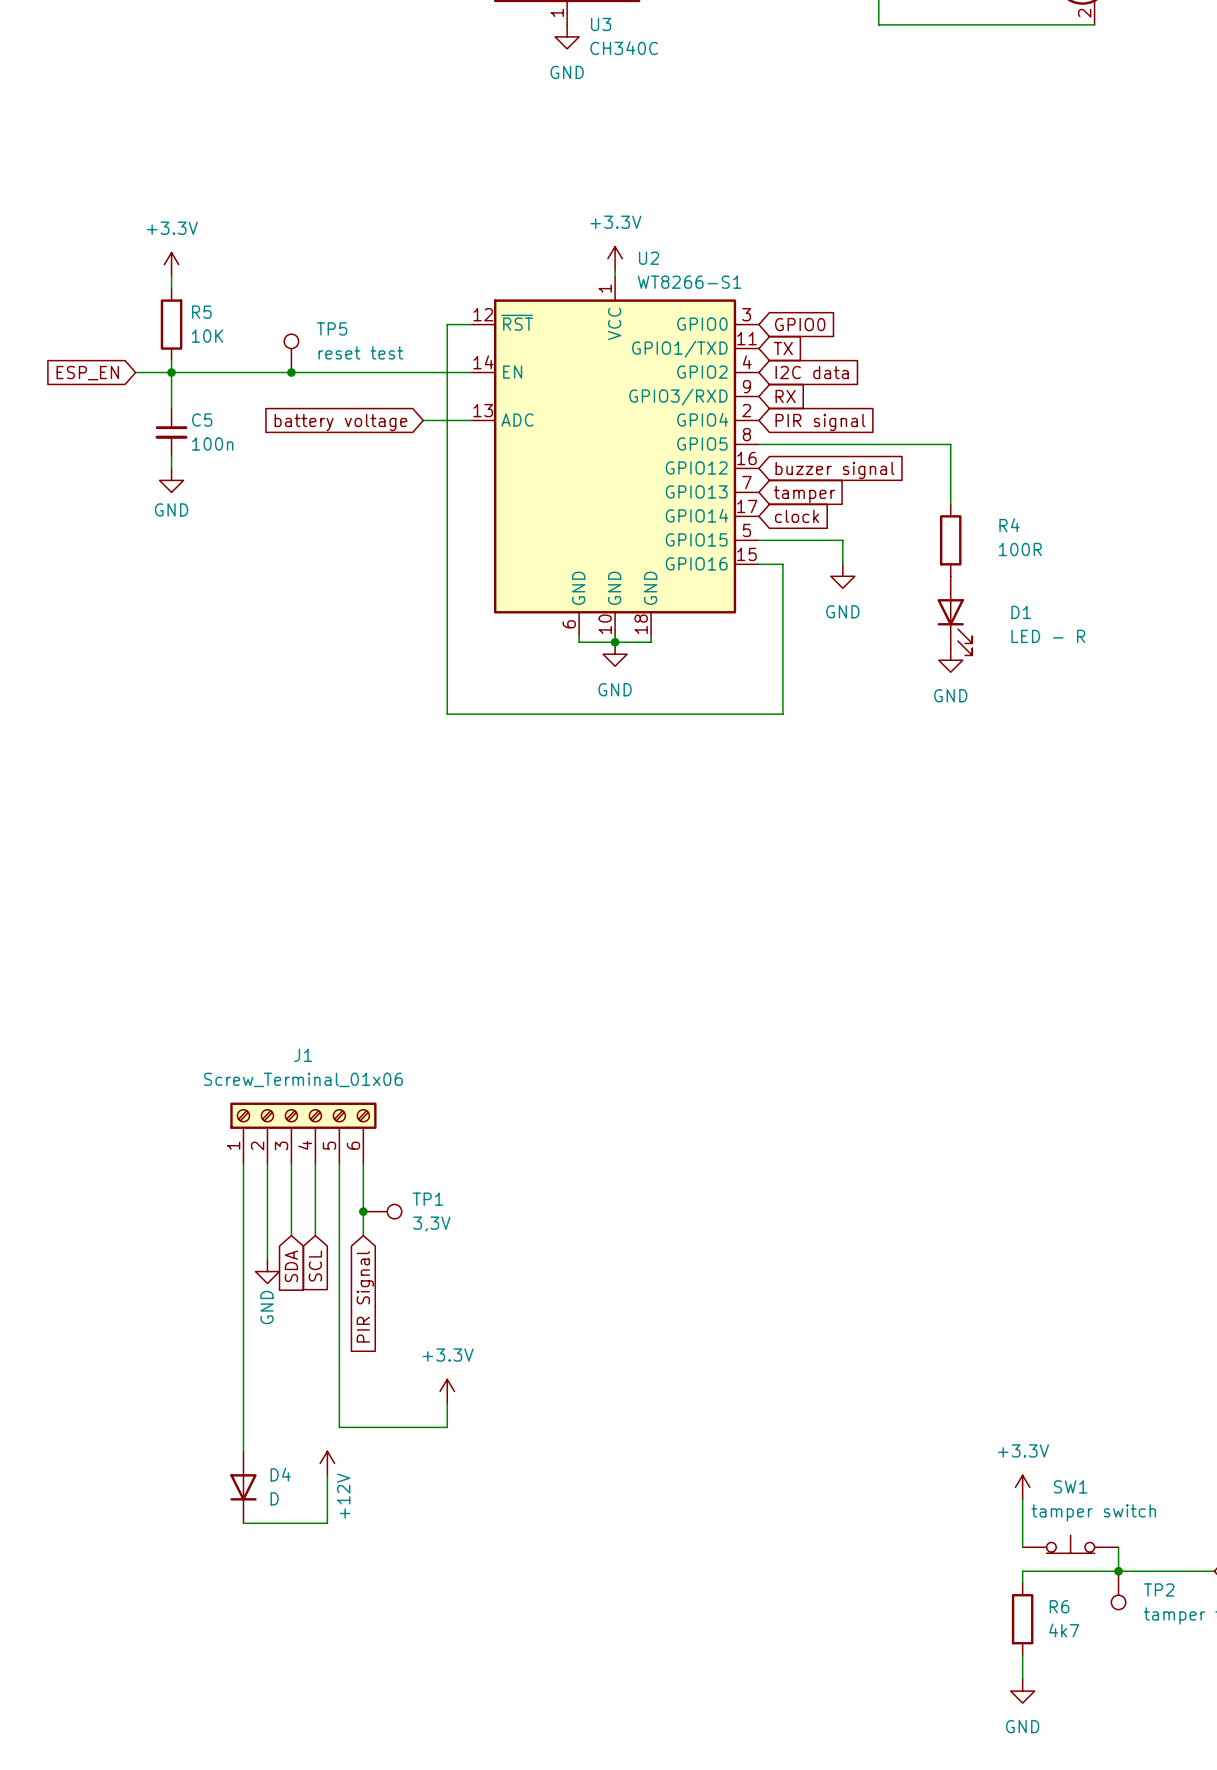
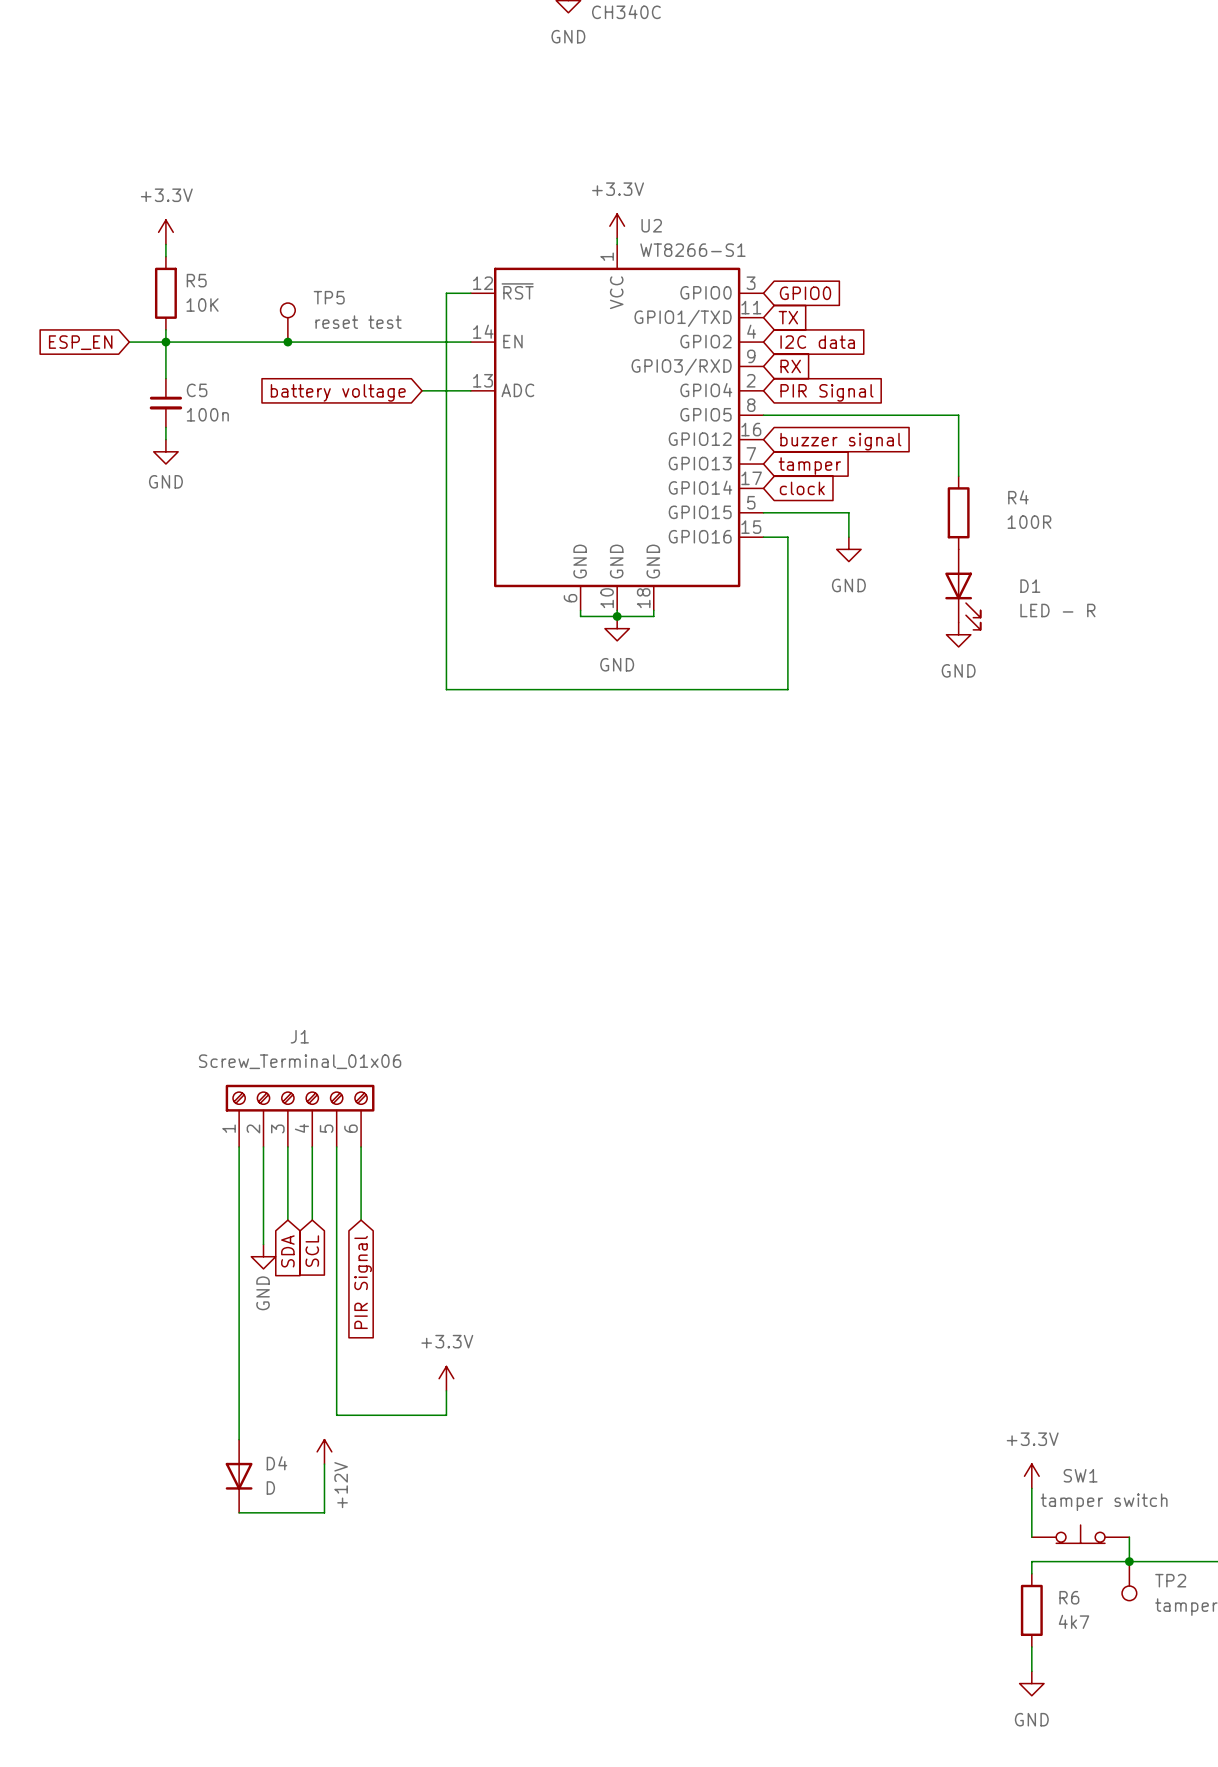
global label: PIR signal (820, 422) -> PIR Signal (826, 392)
junction: (363, 1211) -> none
TP1: 3,3V (382, 1211) -> none

